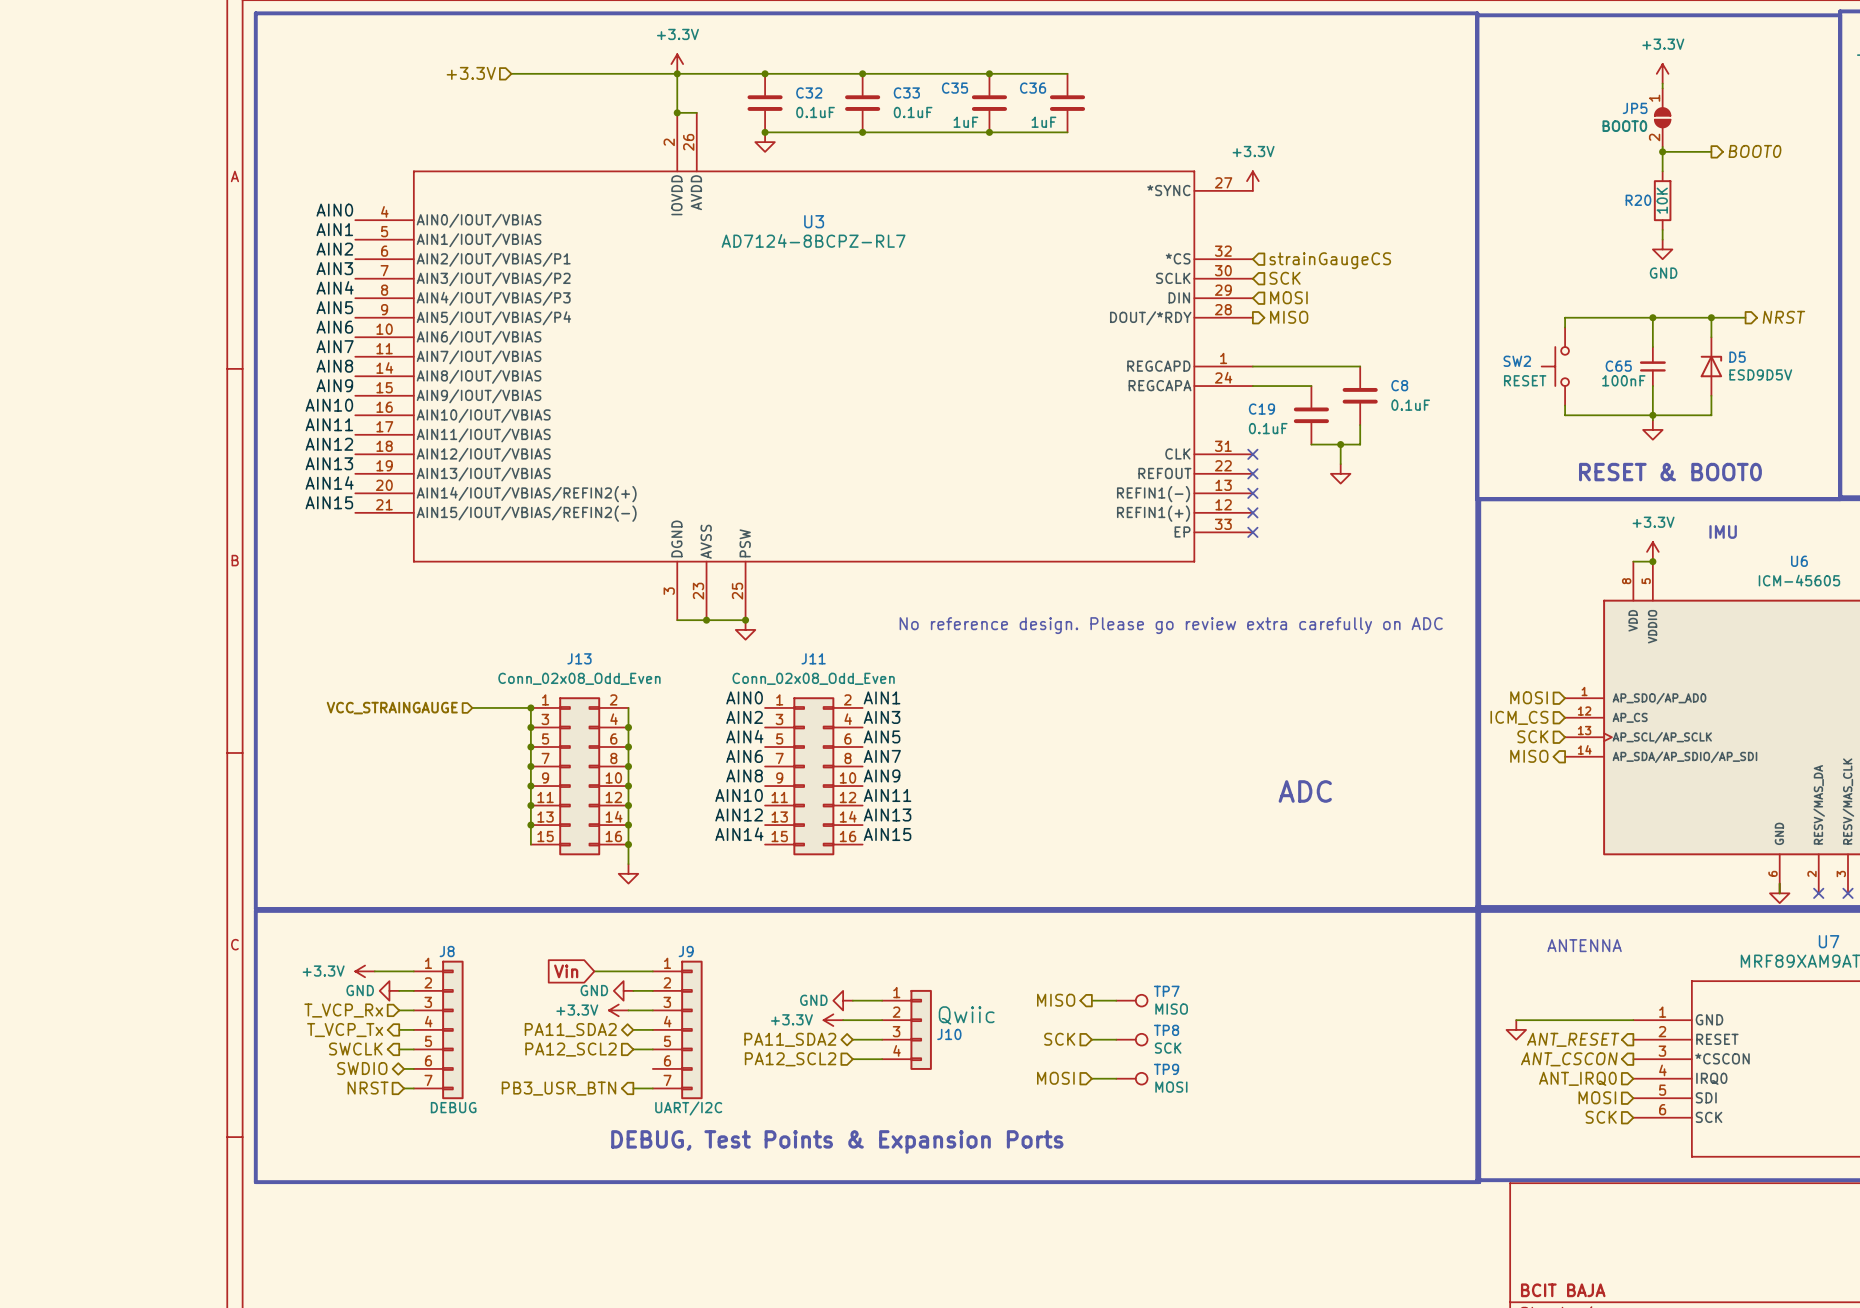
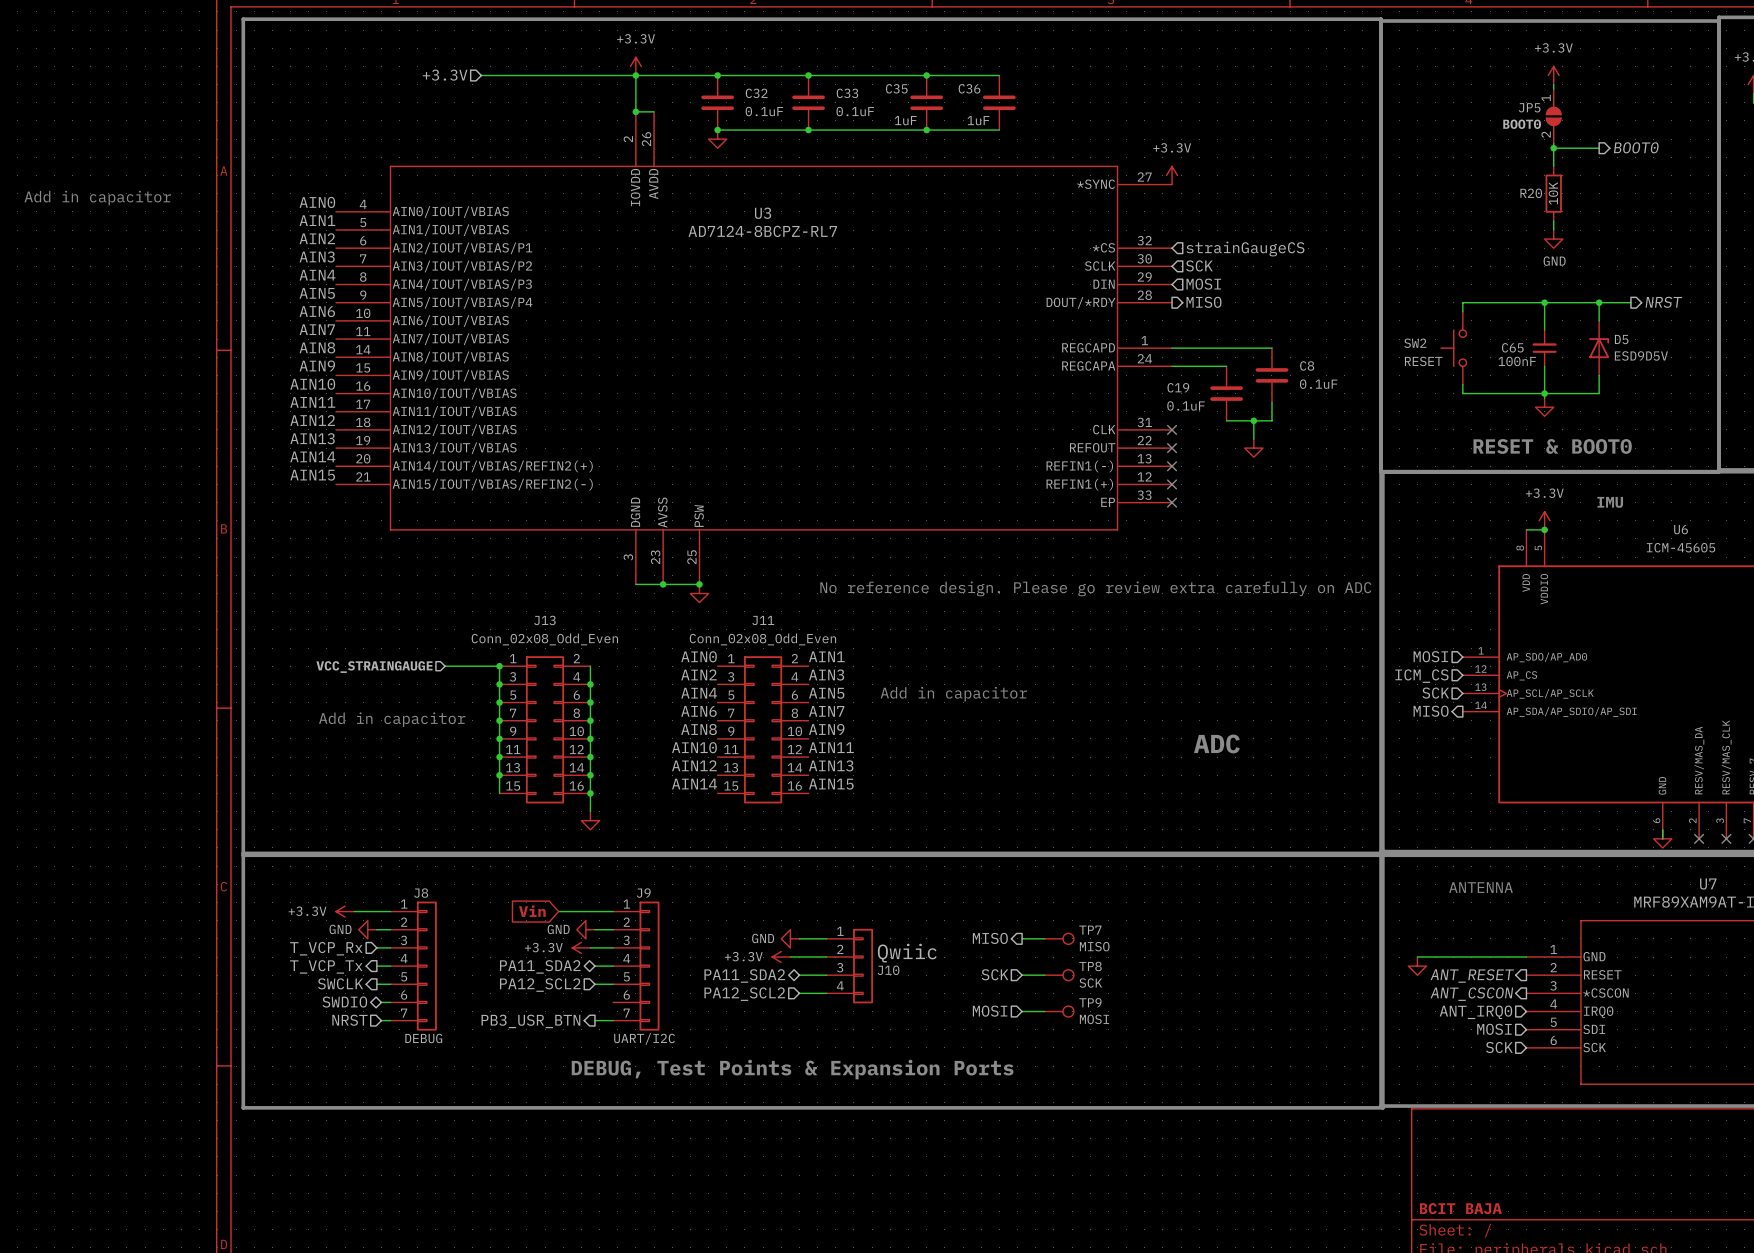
text: none -> Add in capacitor (97, 198)
text: none -> Add in capacitor (953, 694)
text: none -> Add in capacitor (392, 719)

